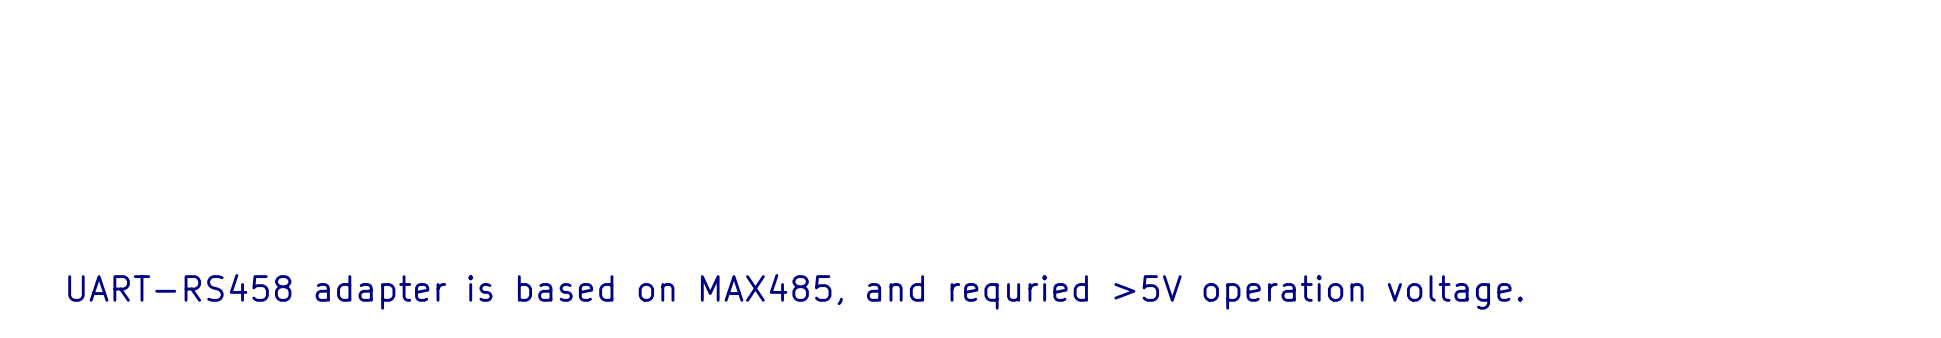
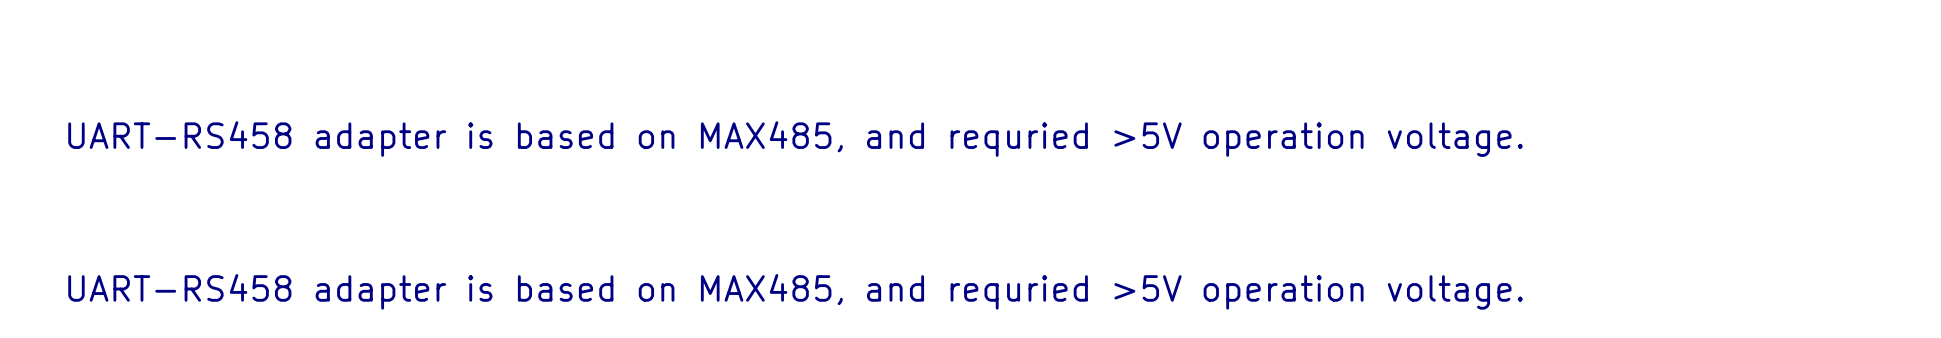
text: none -> UART-RS458 adapter is based on MAX485, and requried >5V operation voltage. (795, 139)

